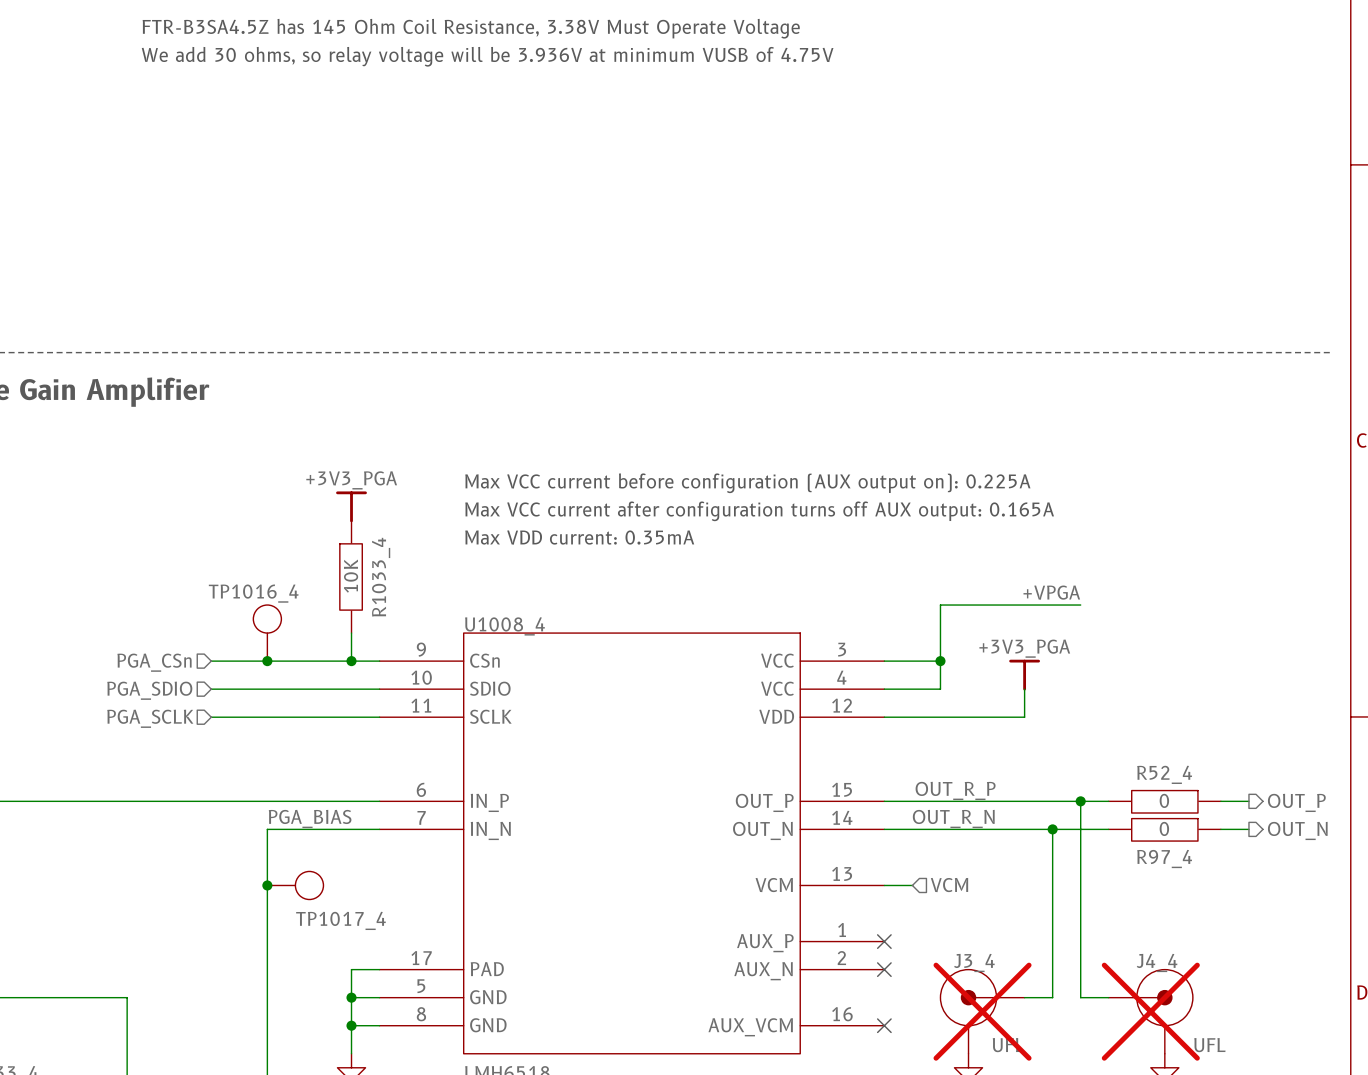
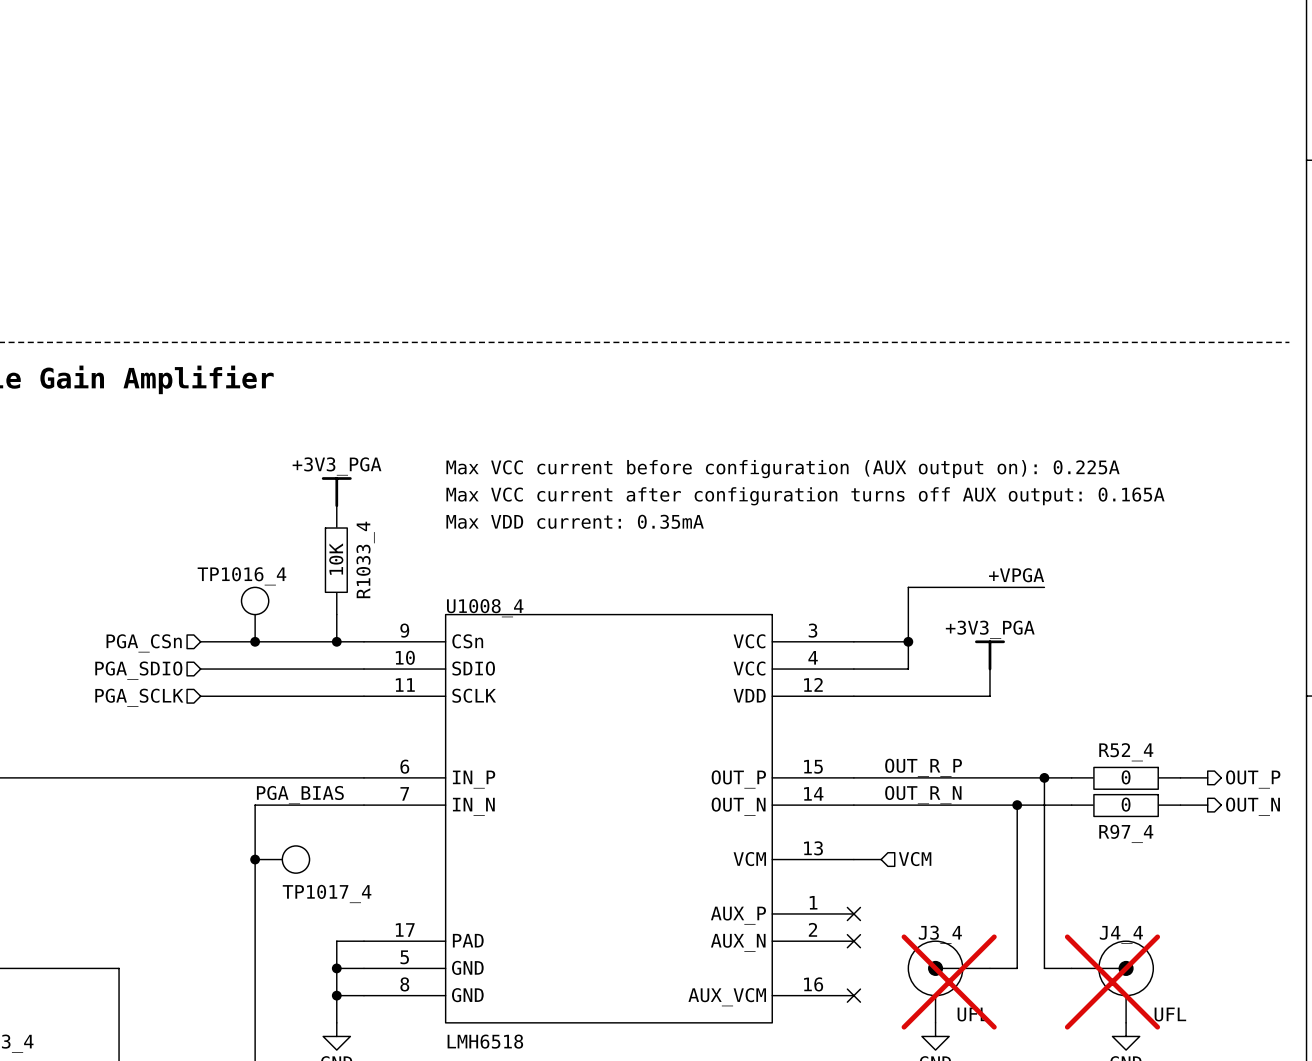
text: FTR-B3SA4.5Z has 145 Ohm Coil Resistance, 3.38V Must Operate Voltage (471, 28) -> none
text: We add 30 ohms, so relay voltage will be 3.936V at minimum VUSB of 4.75V (487, 56) -> none

